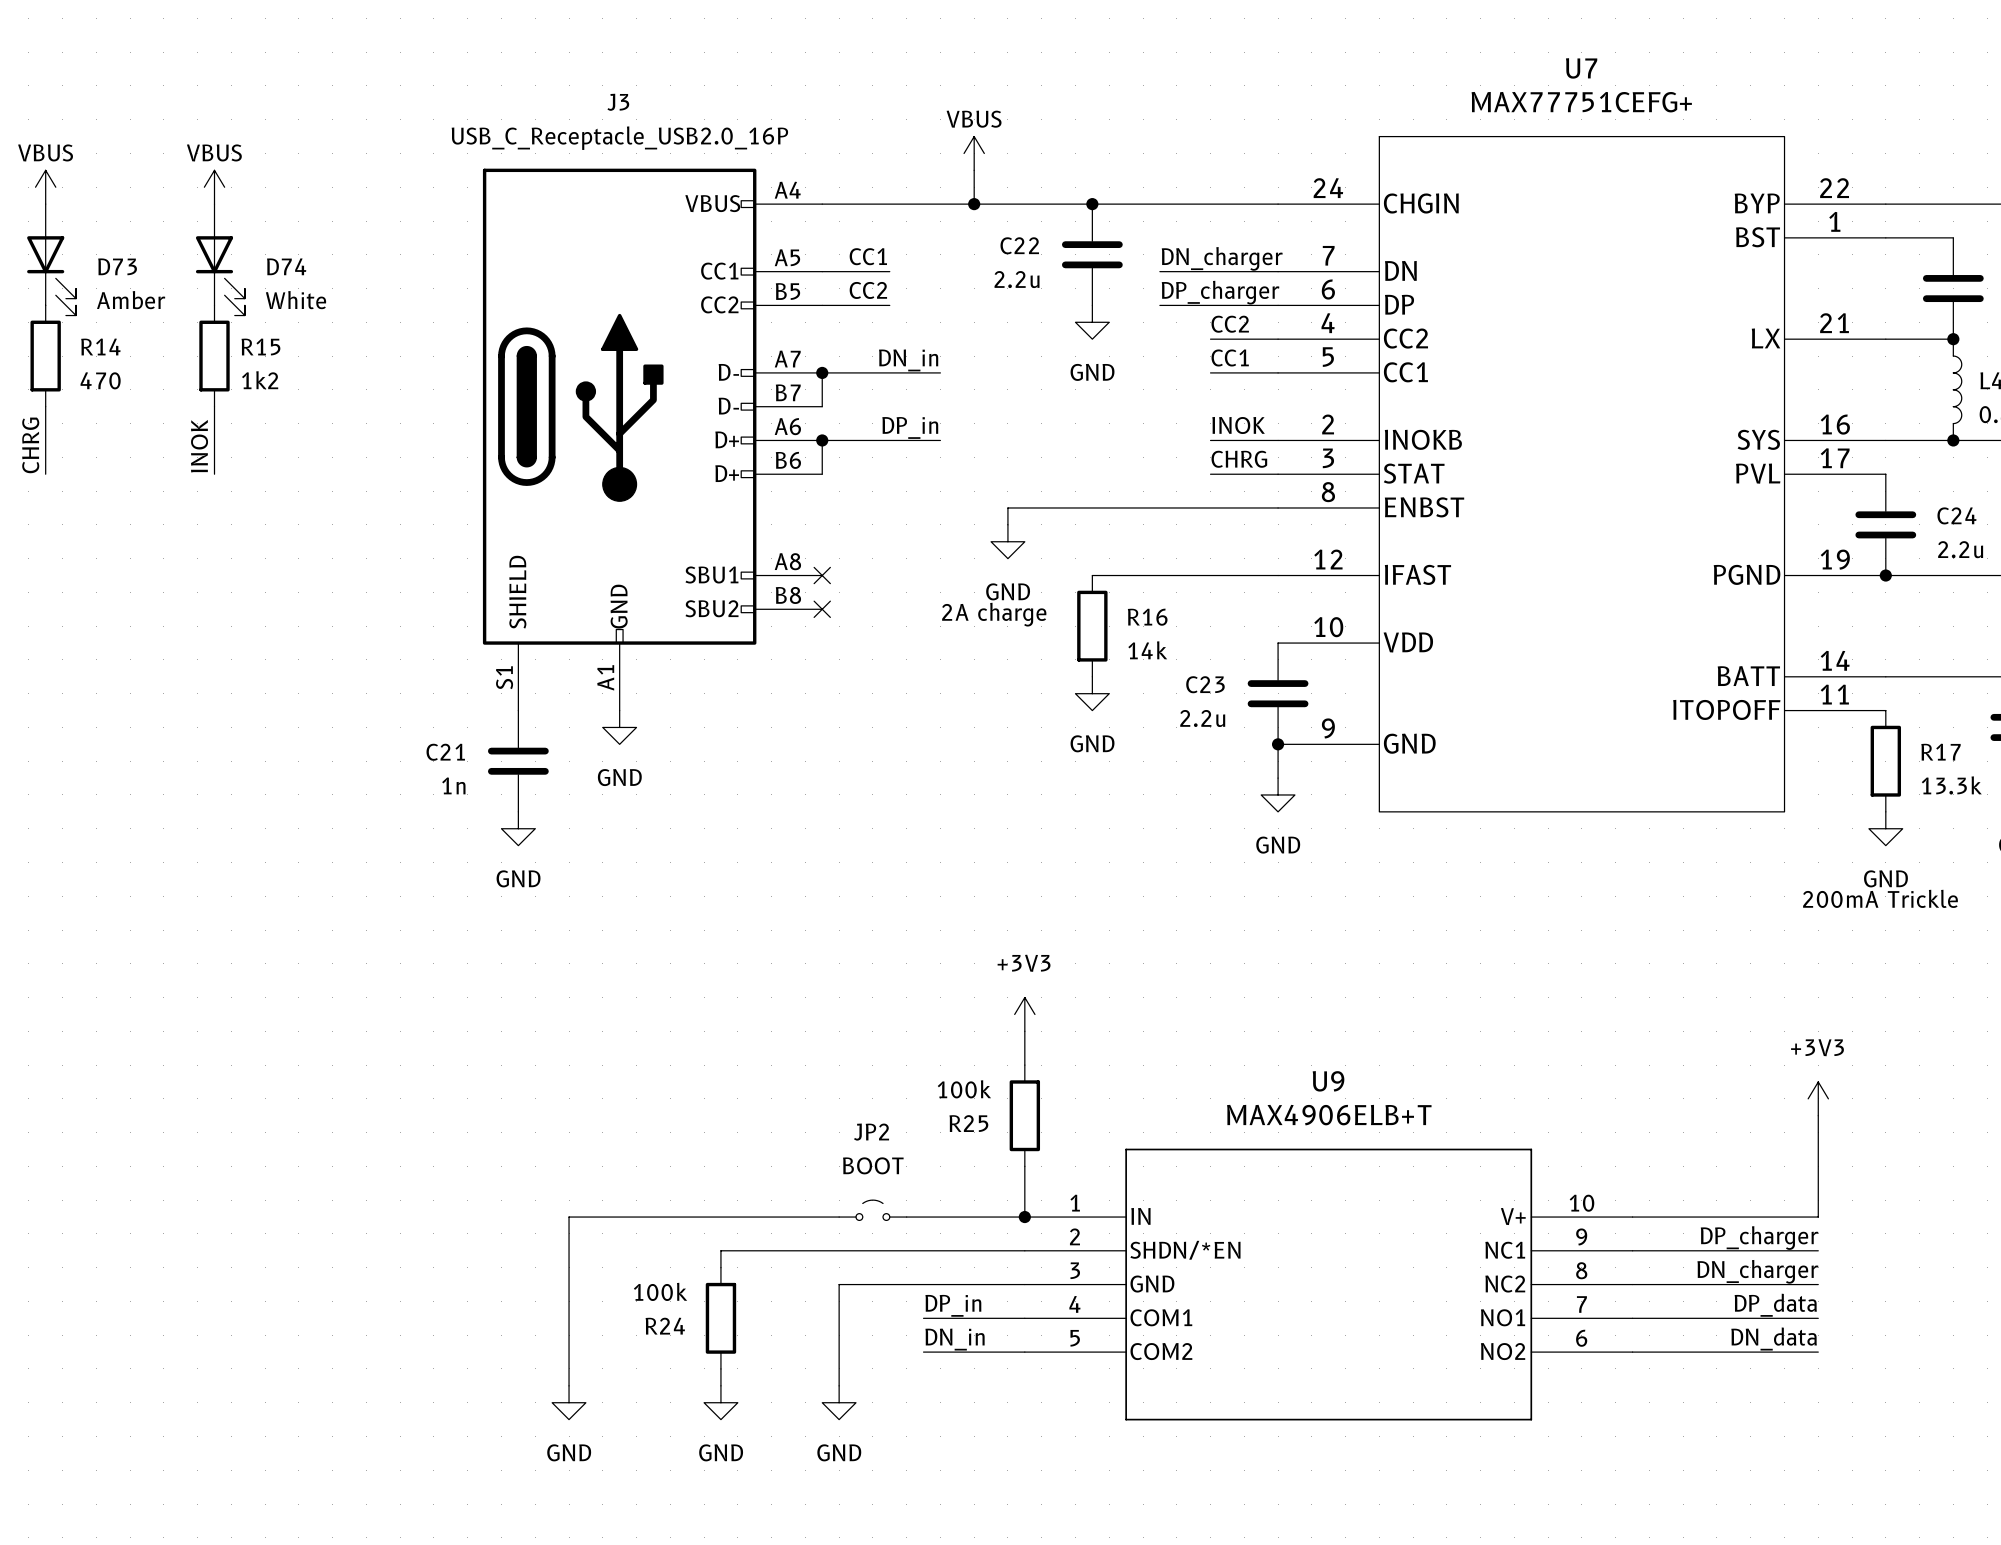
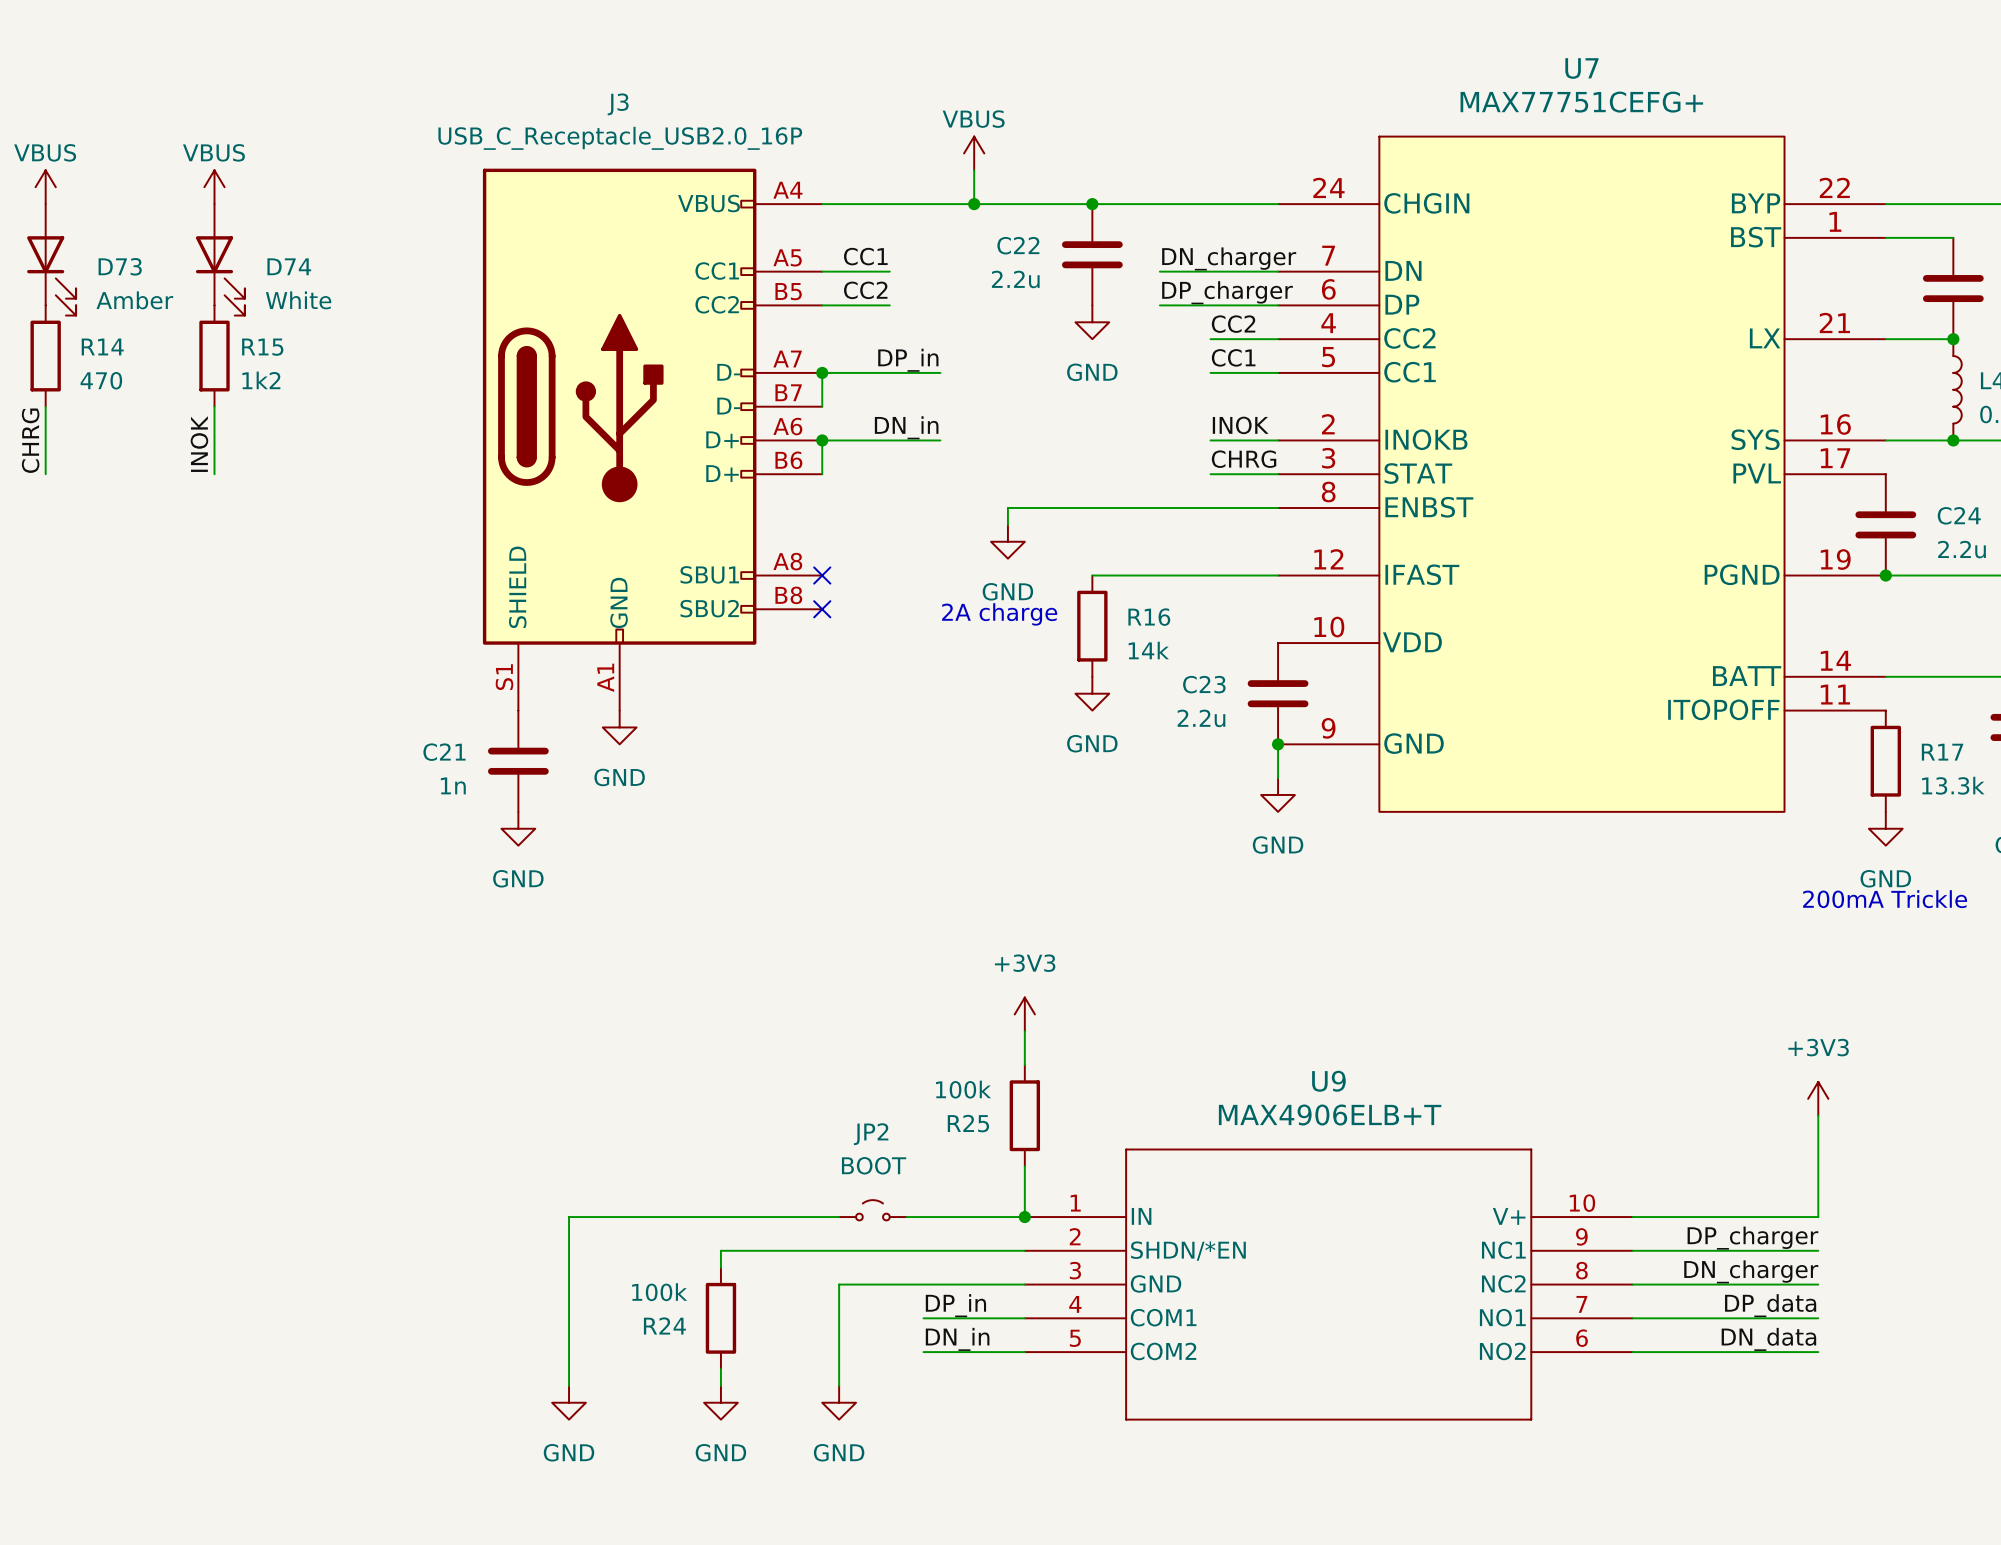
label: DN_in (908, 360) -> DP_in (908, 360)
label: DP_in (910, 427) -> DN_in (906, 427)

